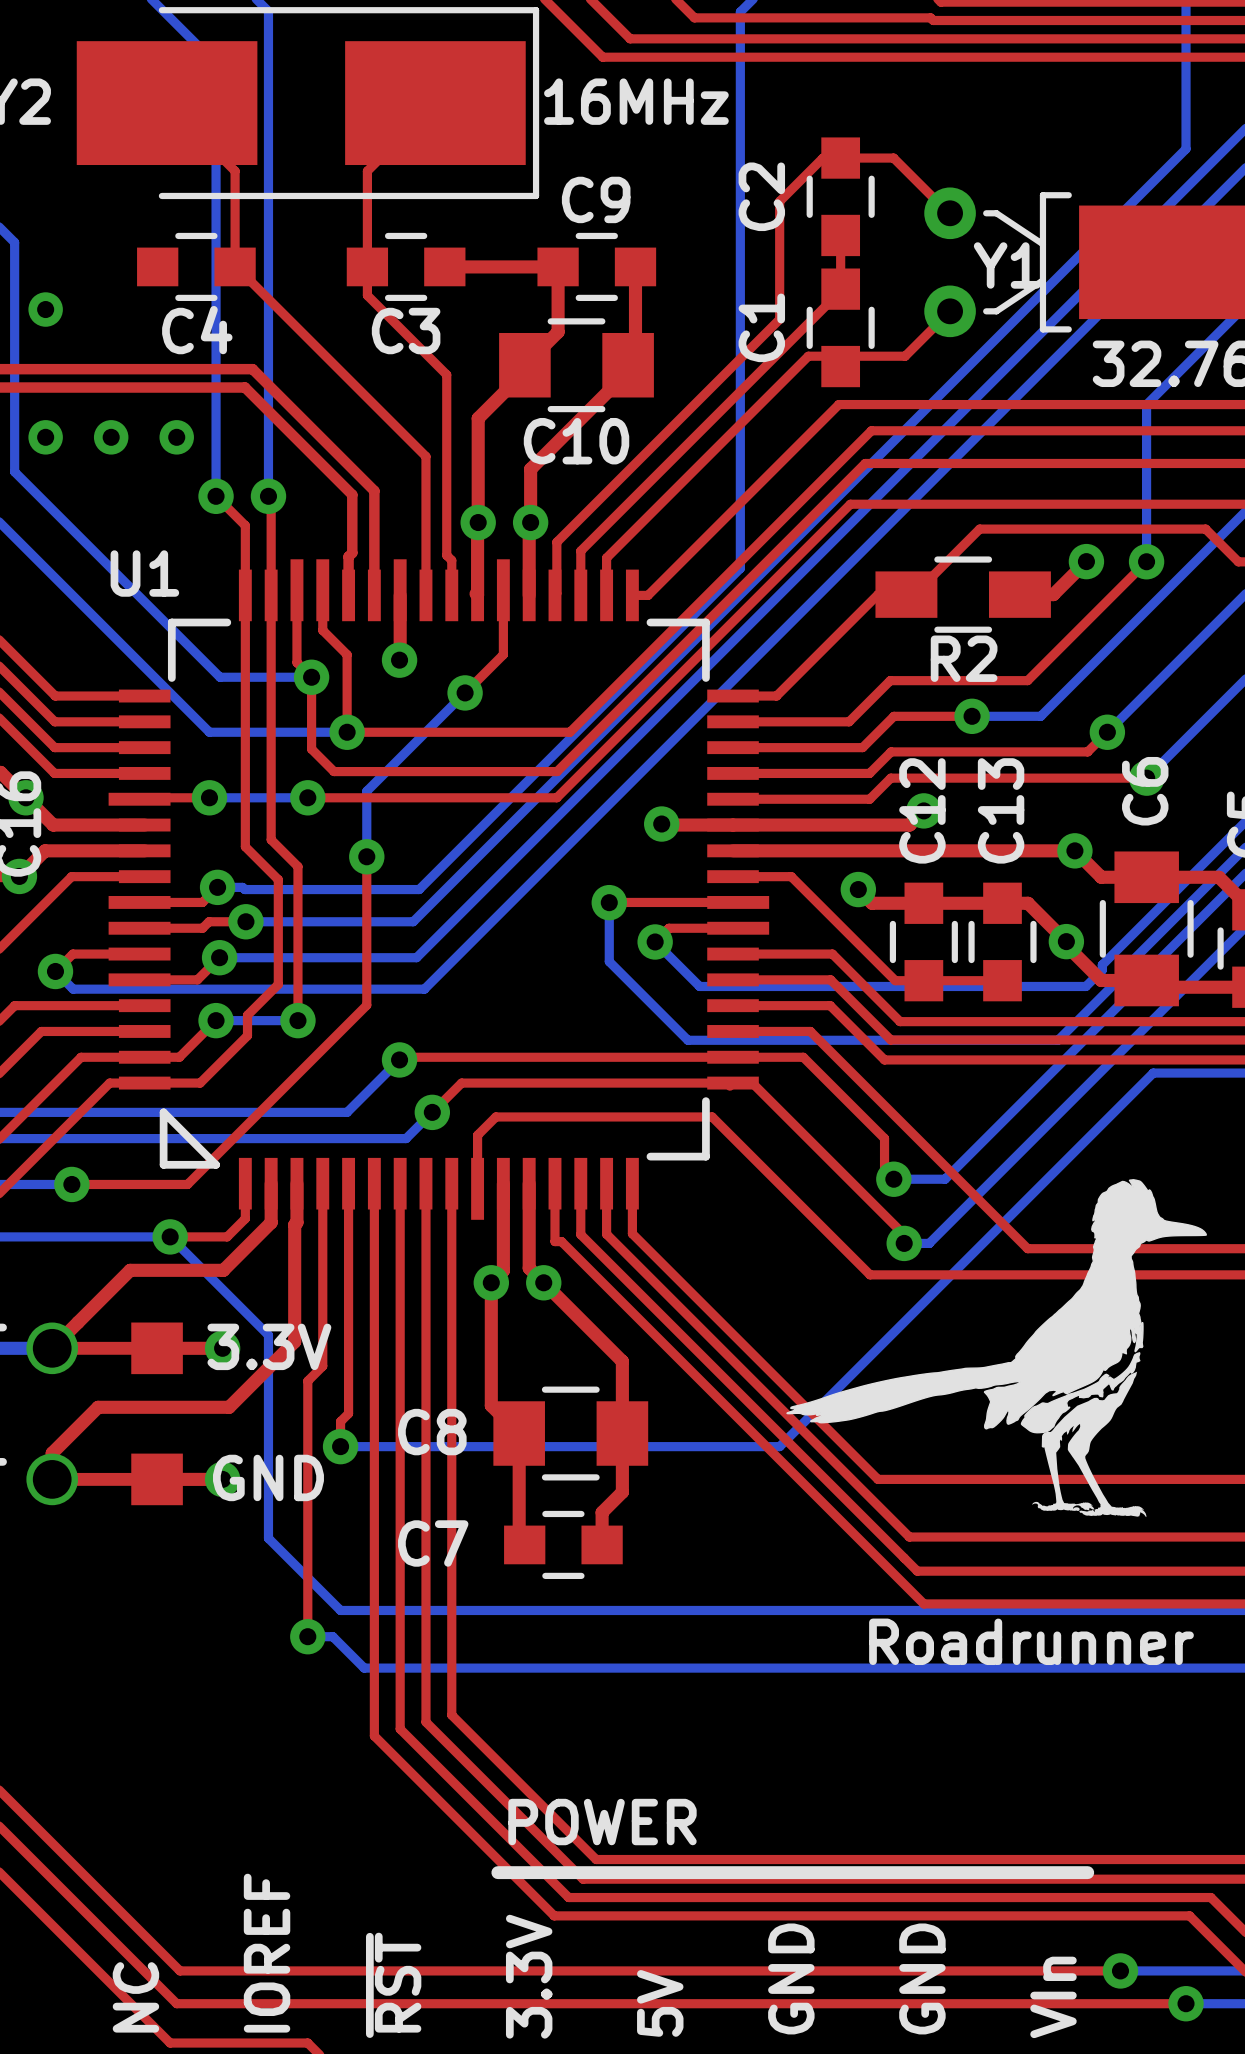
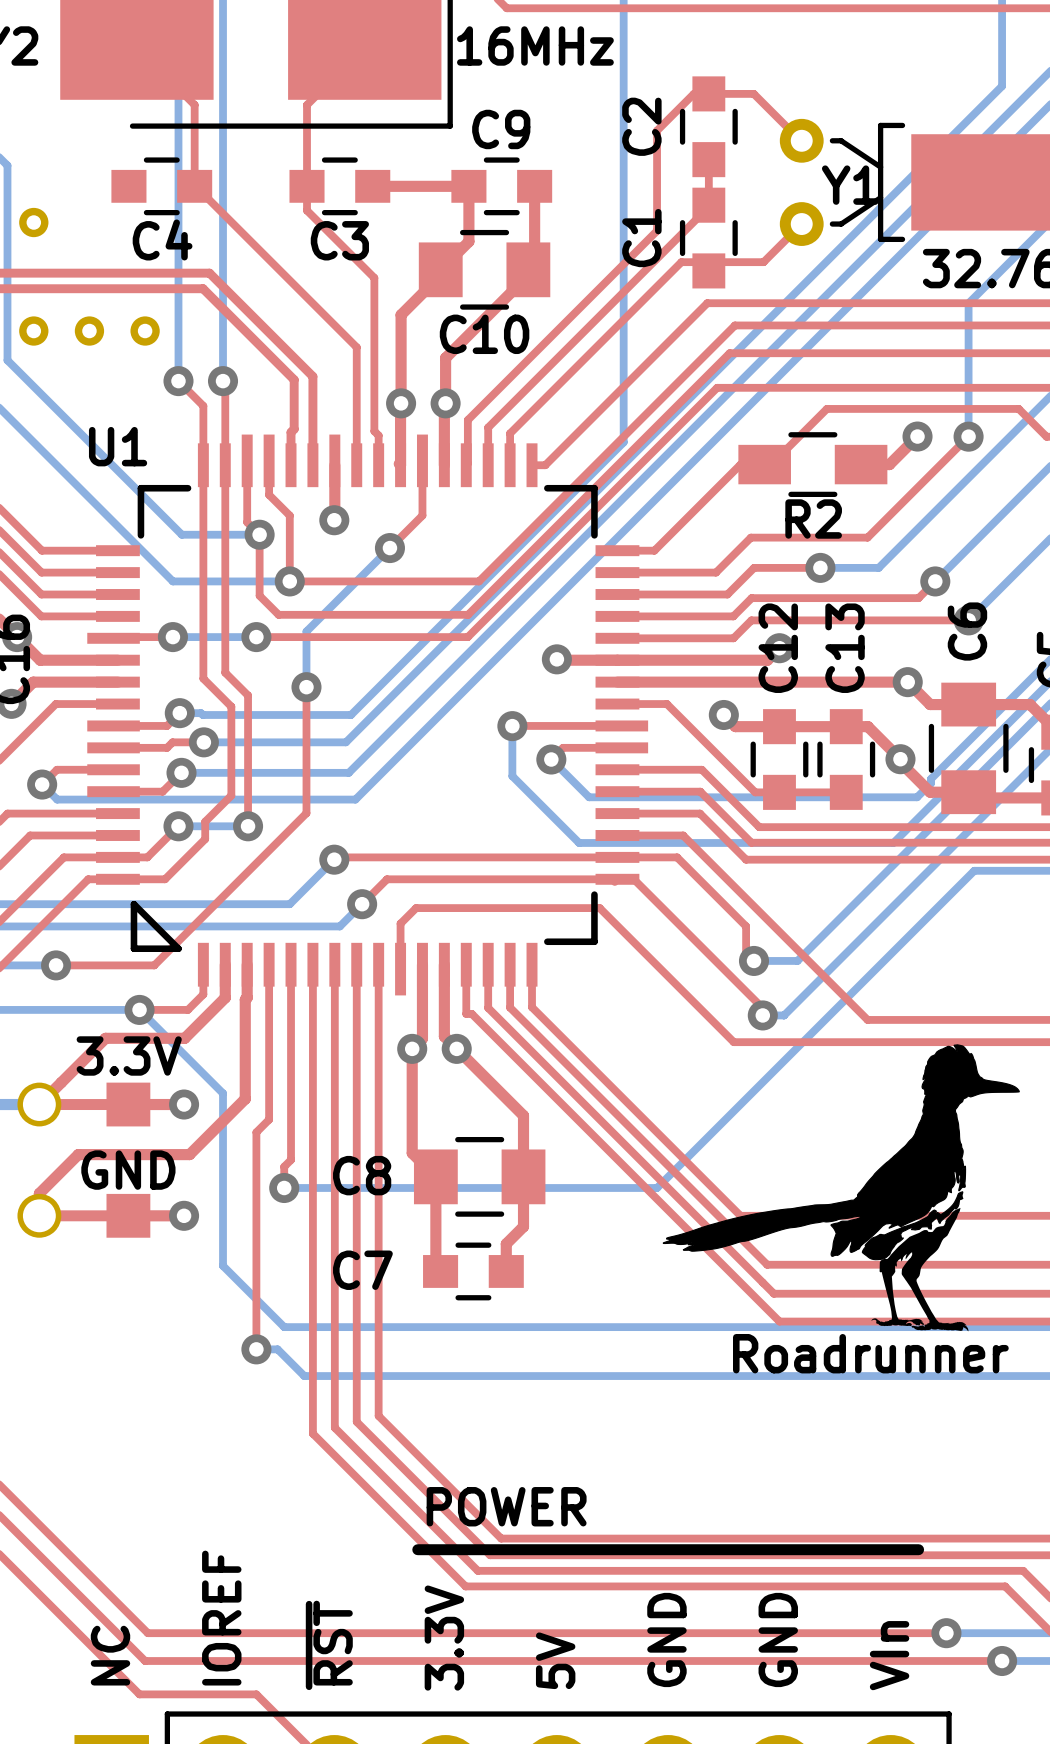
text position: 3.3V (269, 1346) -> 3.3V (129, 1055)
drawing position: (996, 1348) -> (841, 1187)
text position: GND (268, 1477) -> GND (128, 1170)

